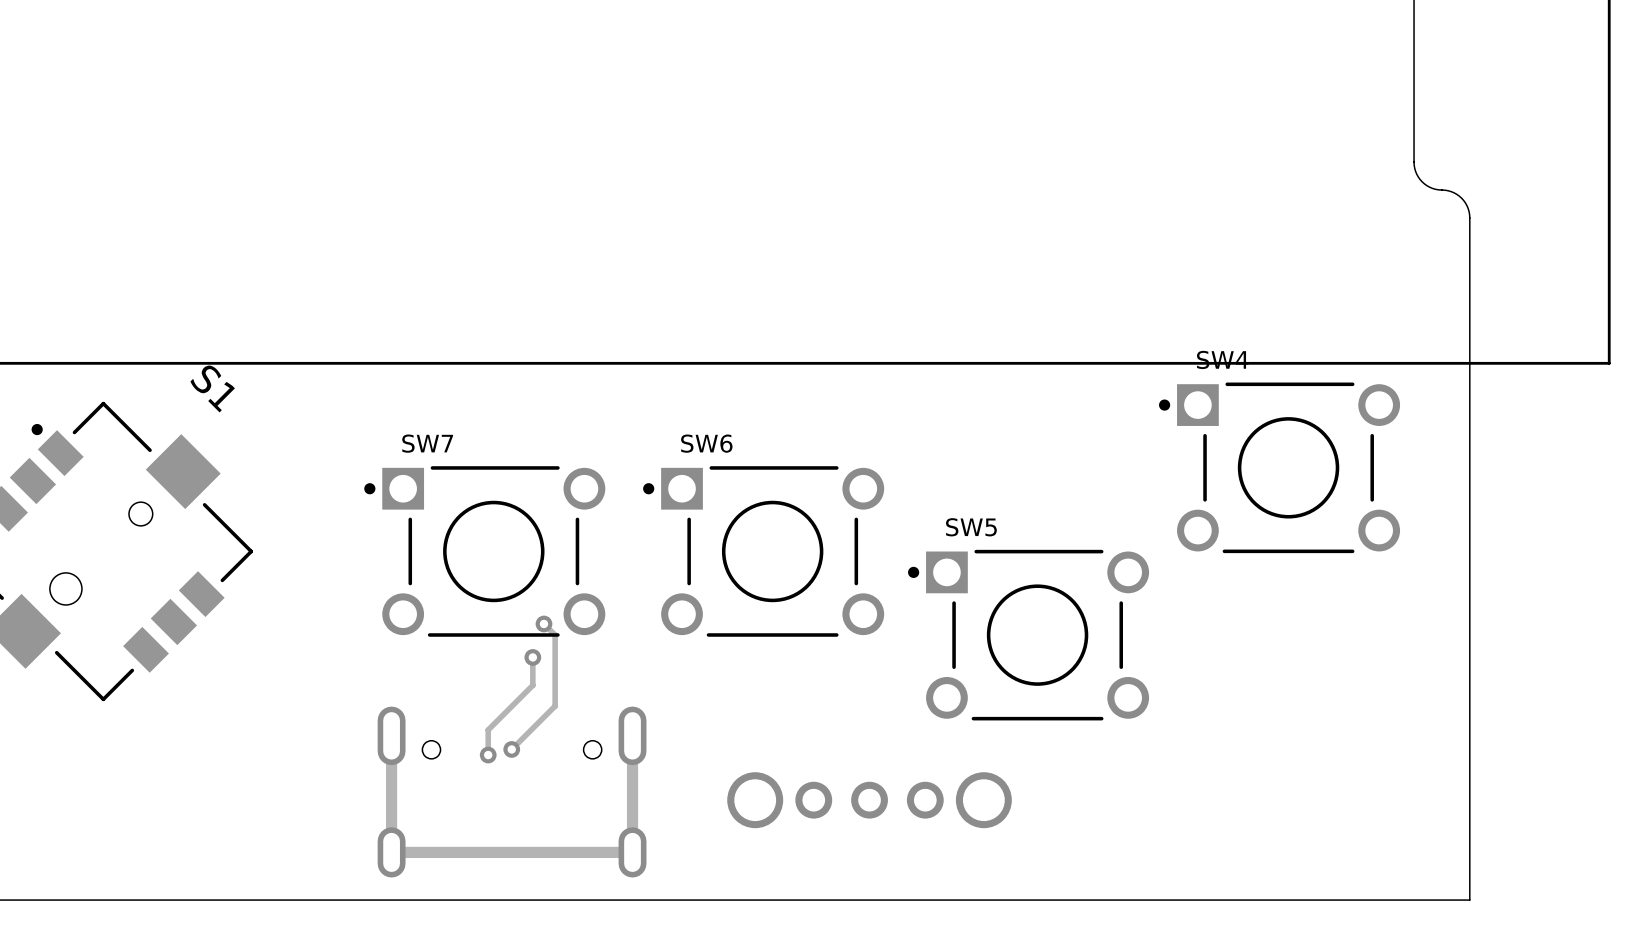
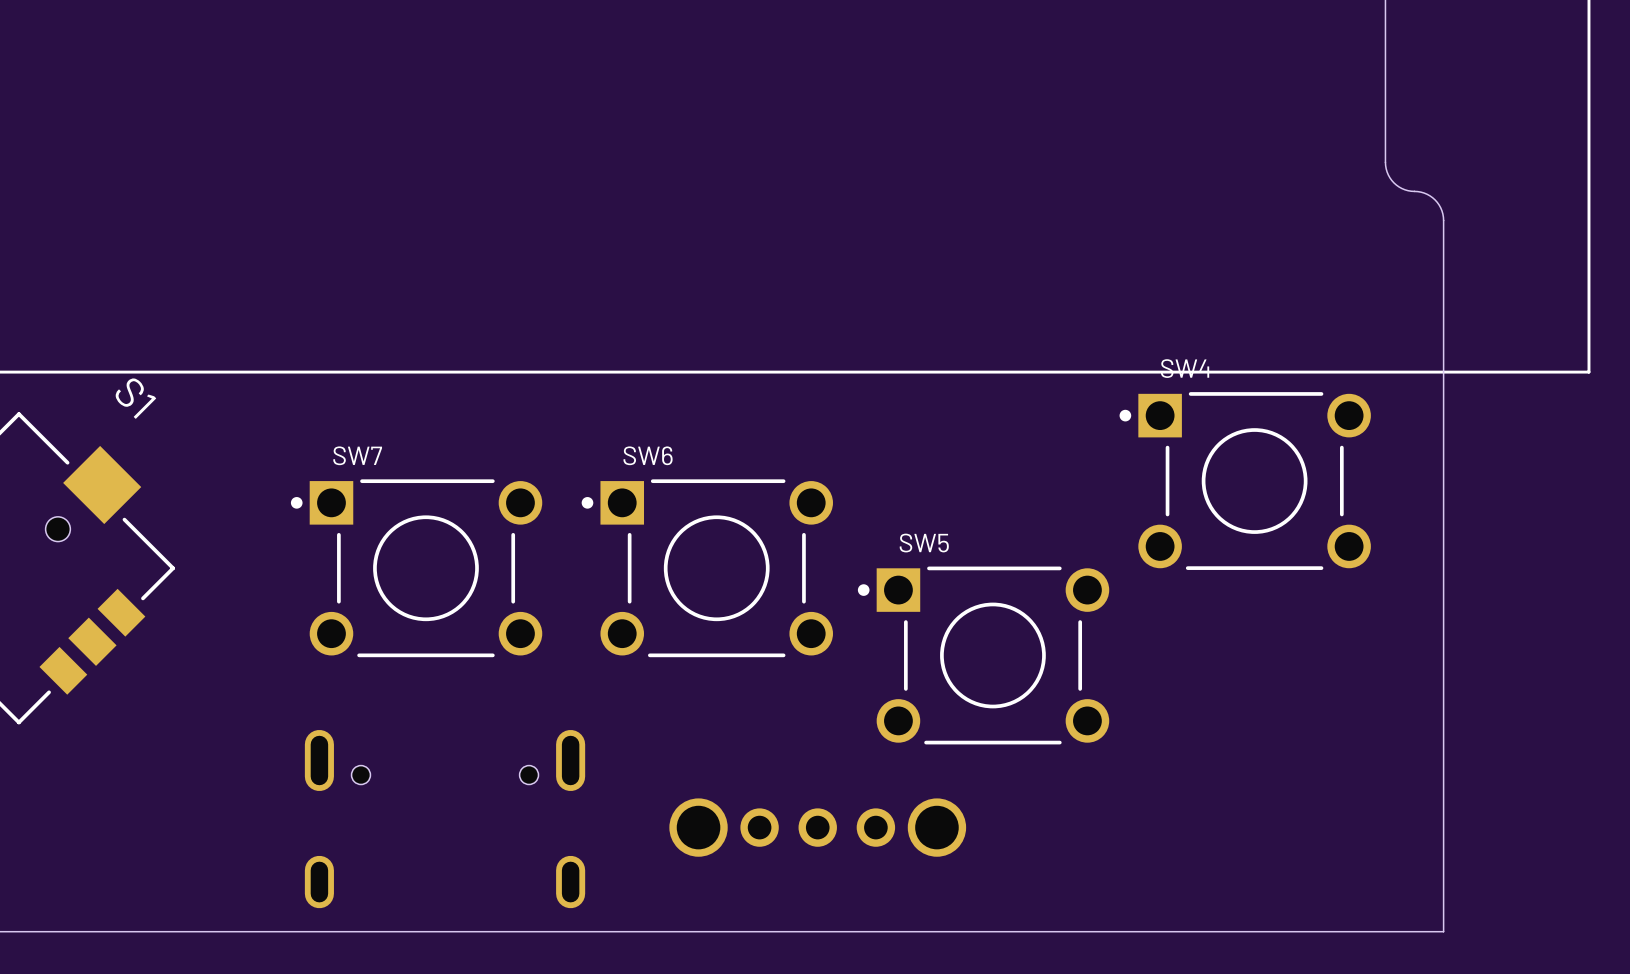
track: (543, 623) (555, 635) (555, 706) (511, 749) -> none
via: (543, 623) -> none
track: (532, 657) (532, 685) (488, 729) (488, 755) -> none
via: (532, 657) -> none
track: (632, 735) (632, 852) (391, 852) (391, 735) -> none
via: (511, 749) -> none
via: (488, 755) -> none

